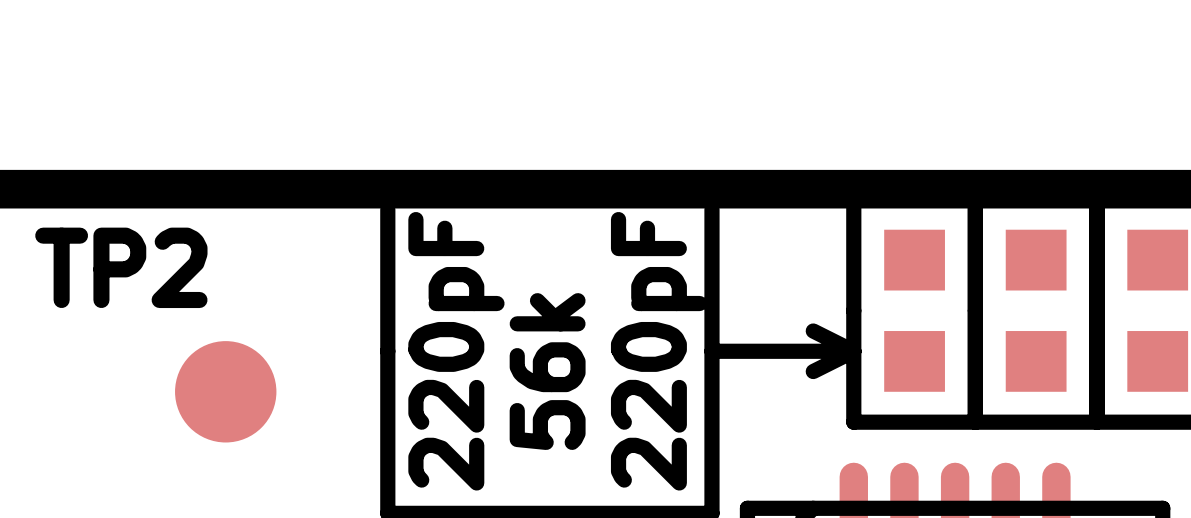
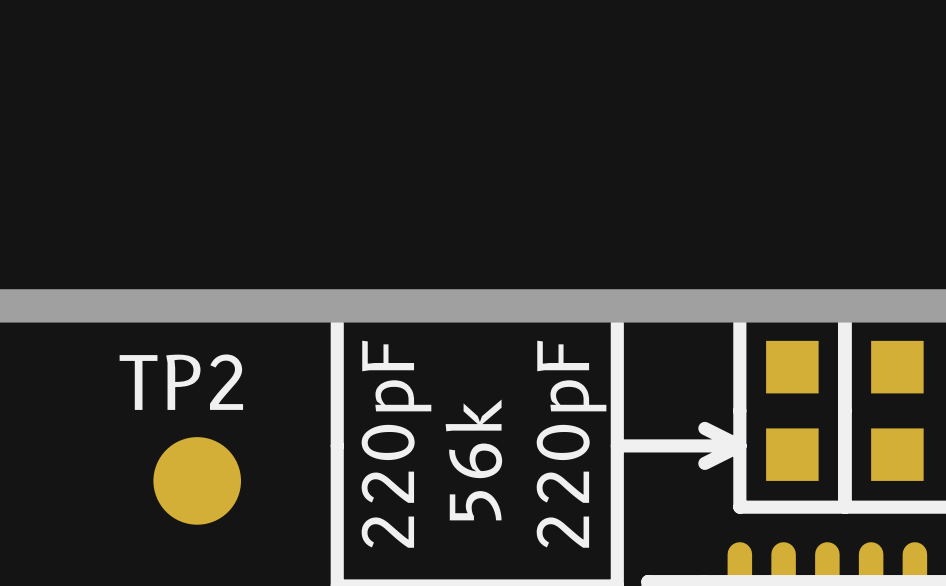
TP2 name position: TP2 (121, 267) -> TP2 (181, 382)

